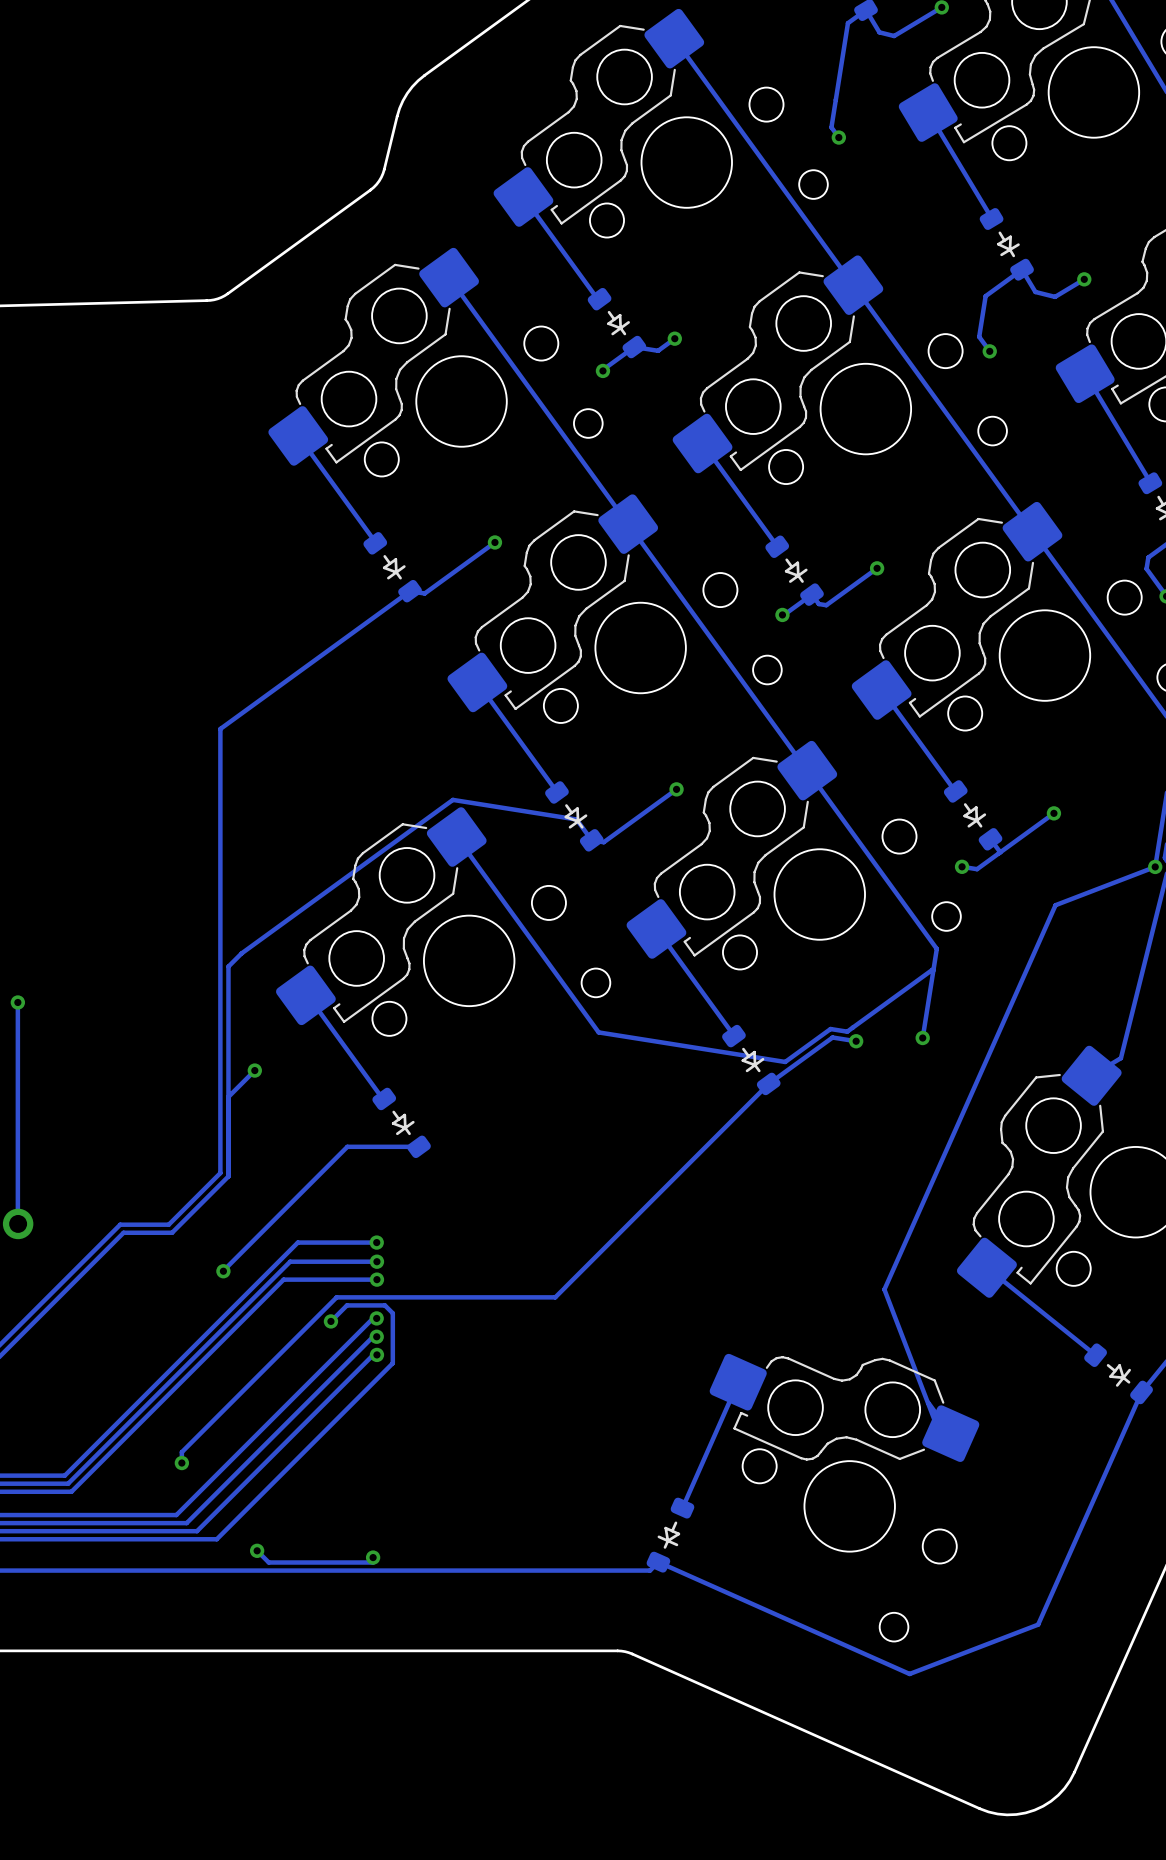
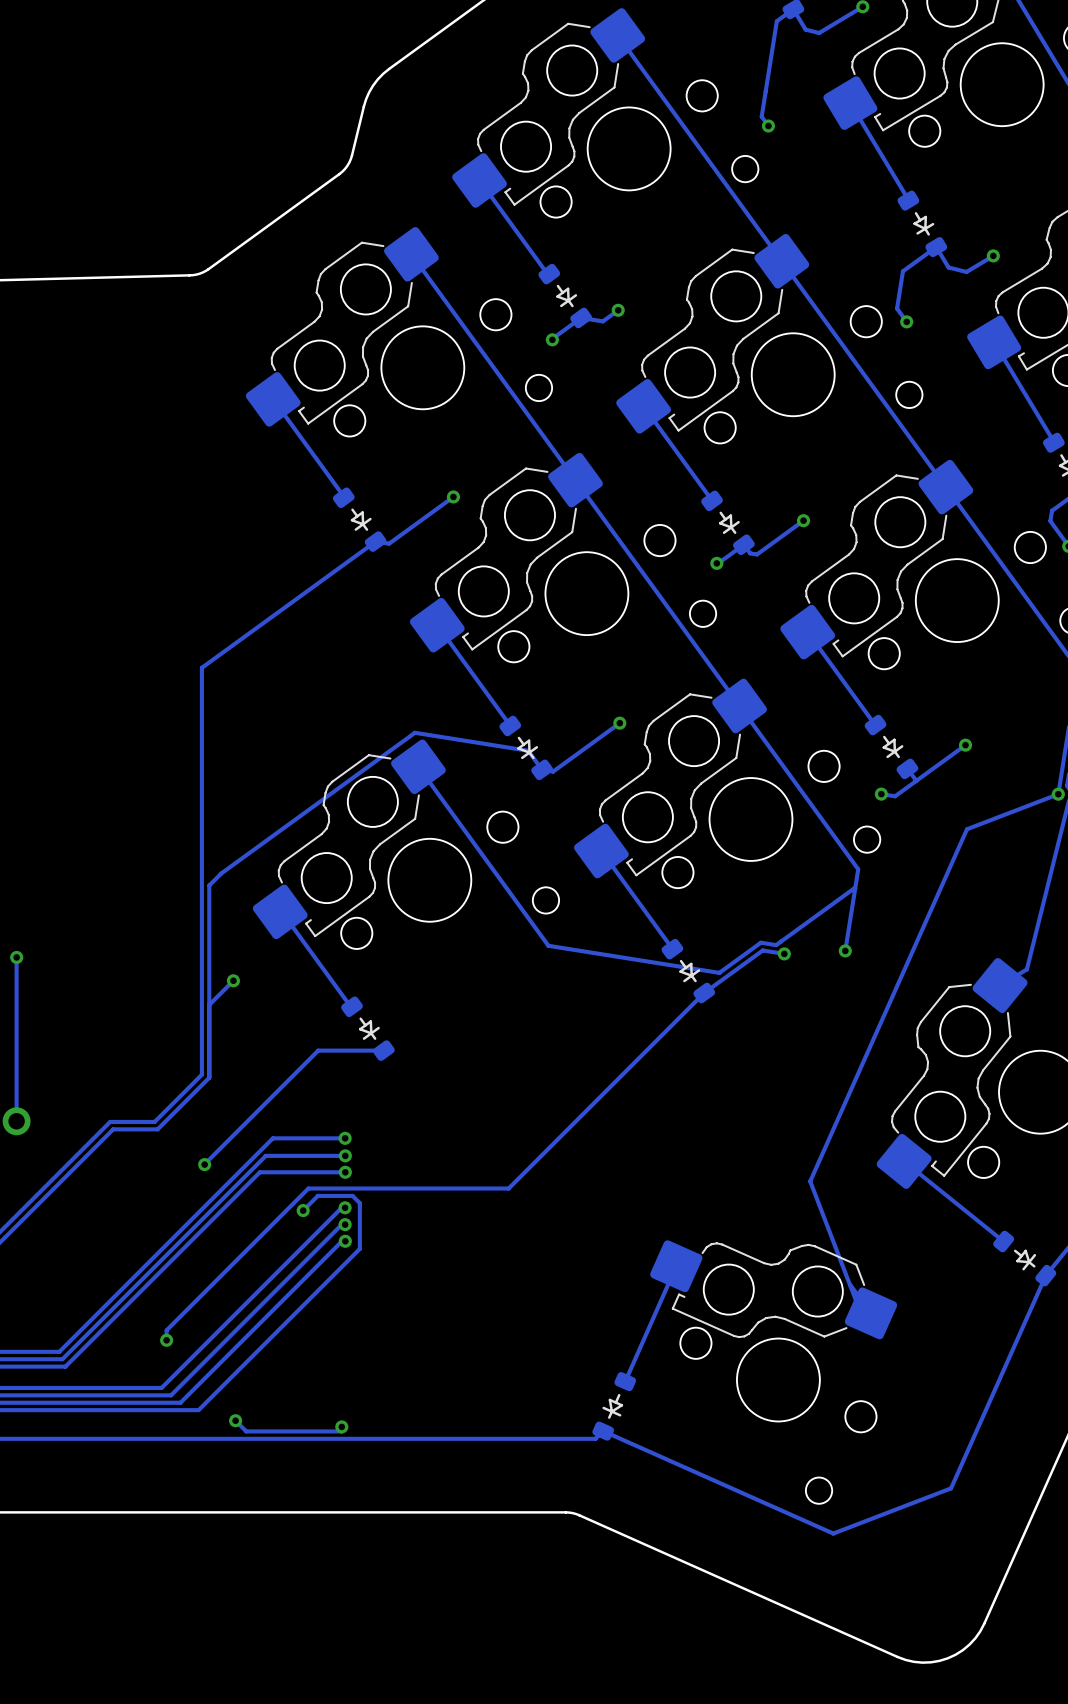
track: (17, 1002) (17, 1223) -> (16, 964) (16, 1121)
via position: (17, 1002) -> (16, 957)

